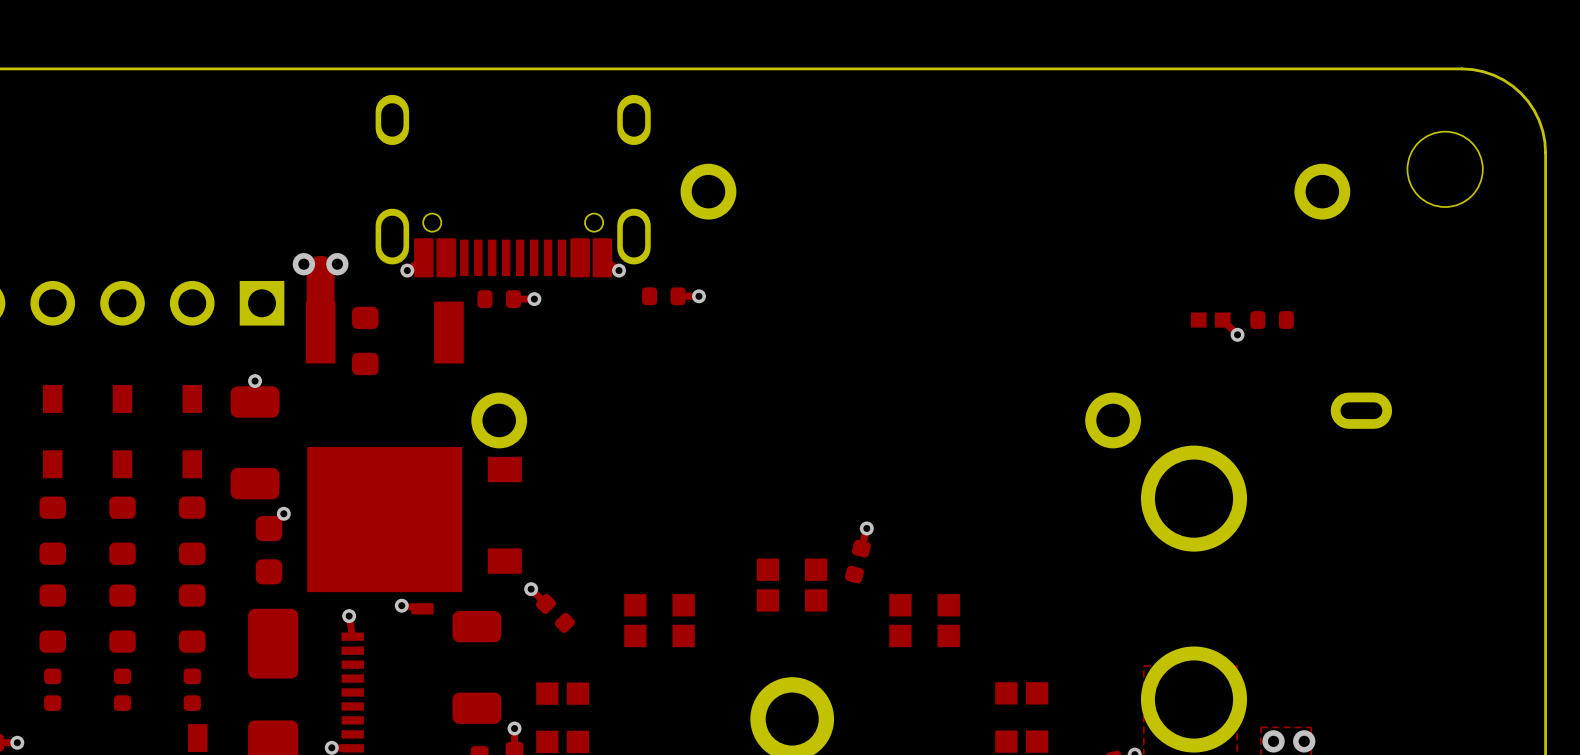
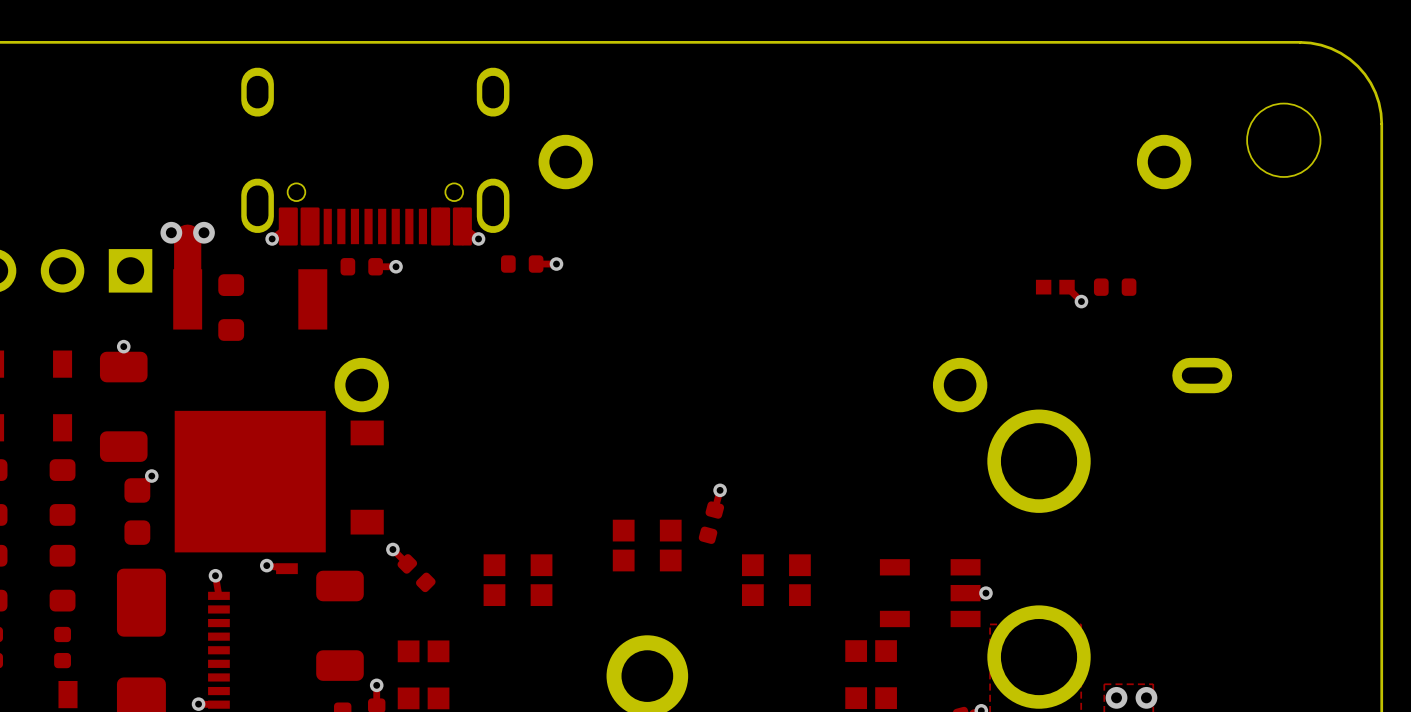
part: none -> (930, 593)
via: none -> (985, 593)

